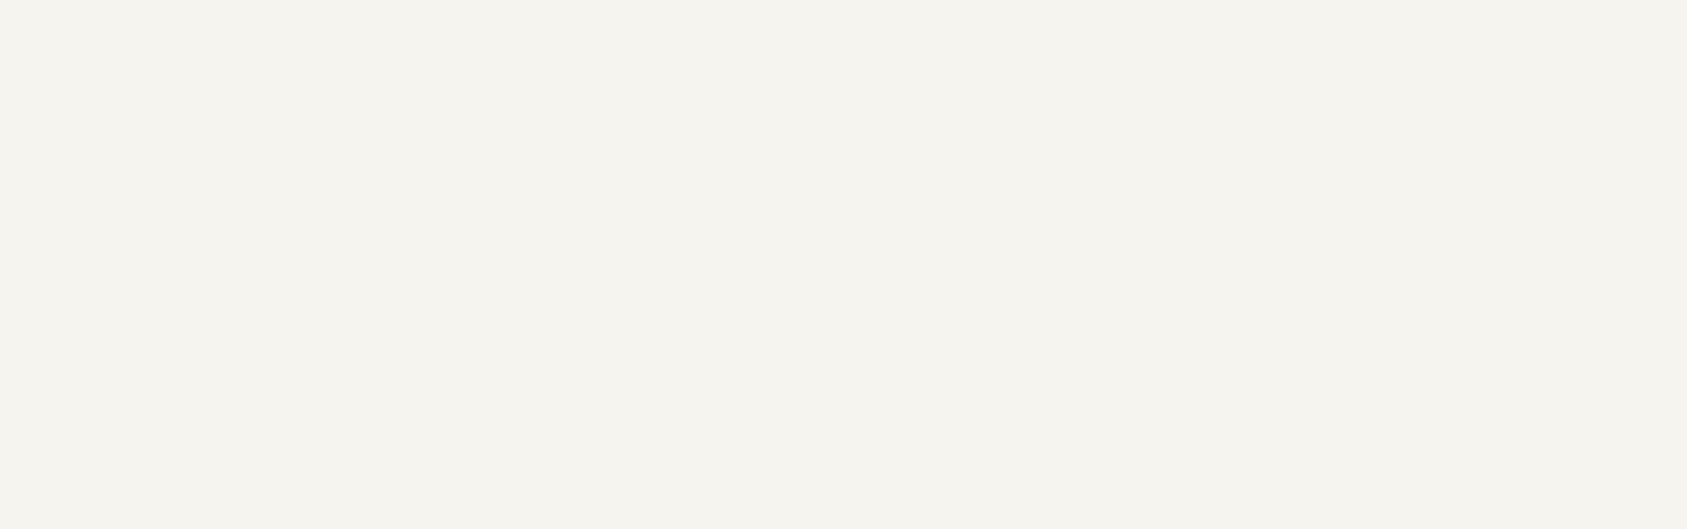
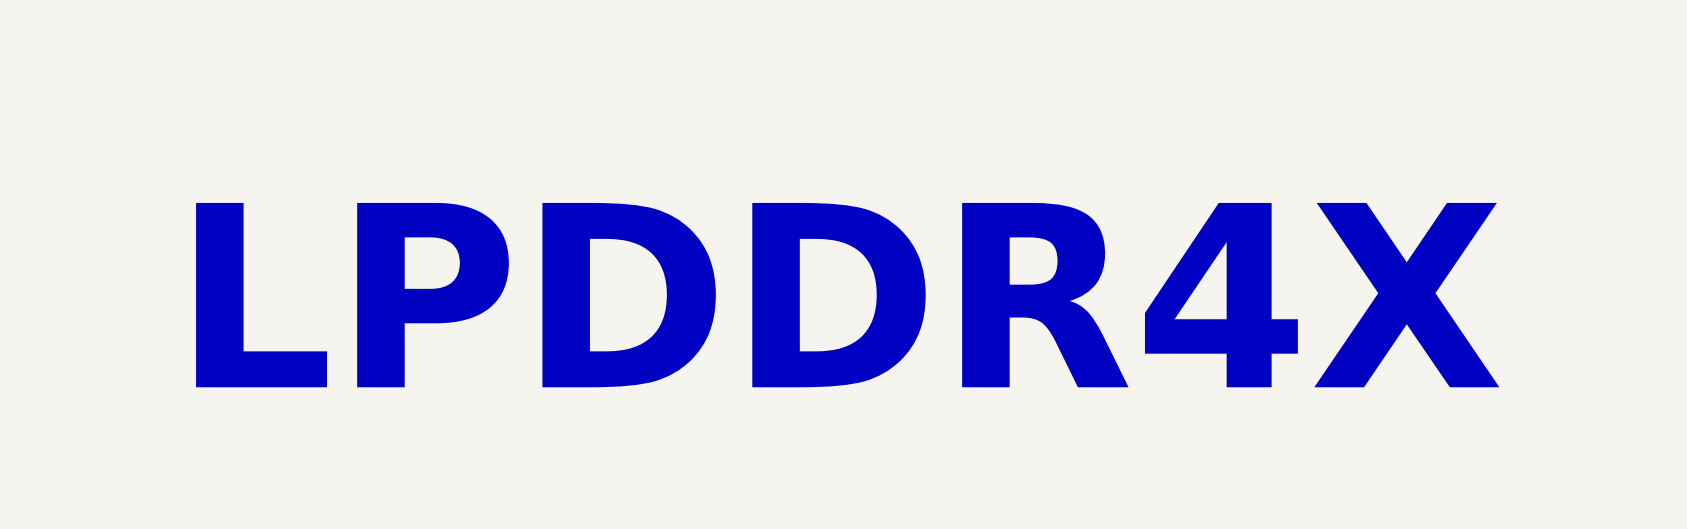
text: none -> LPDDR4X (847, 295)

